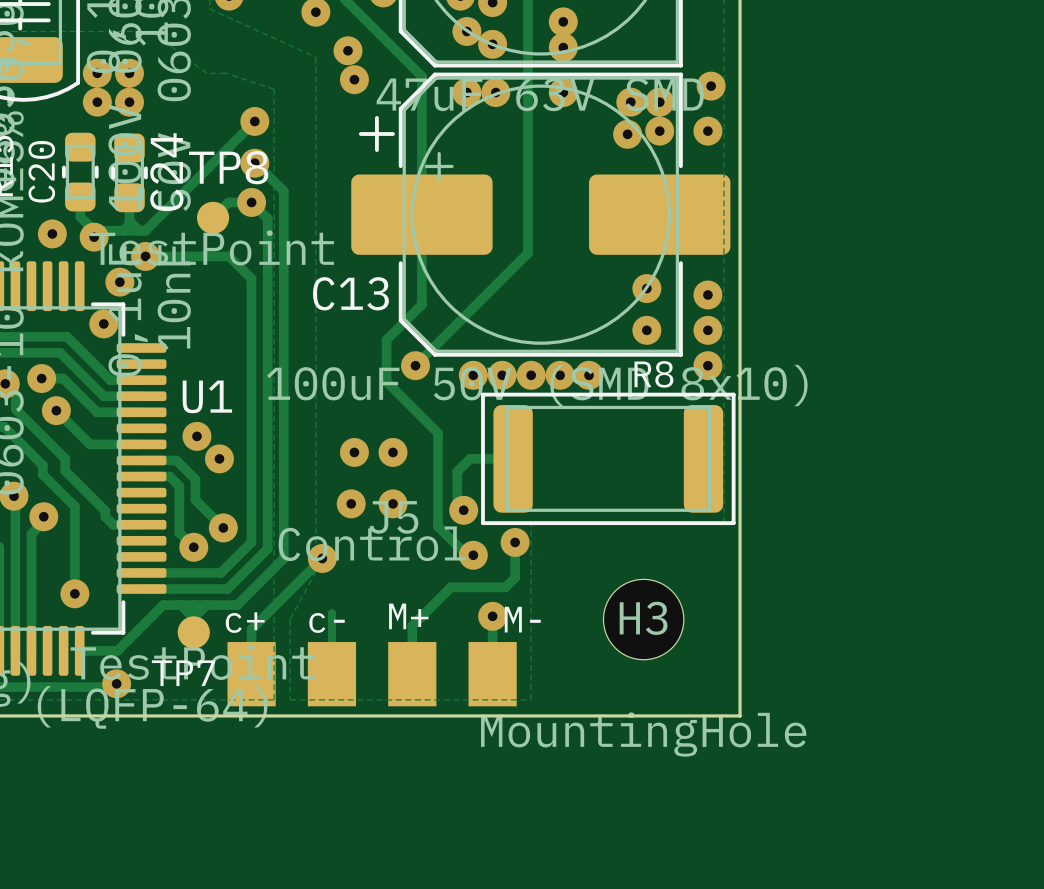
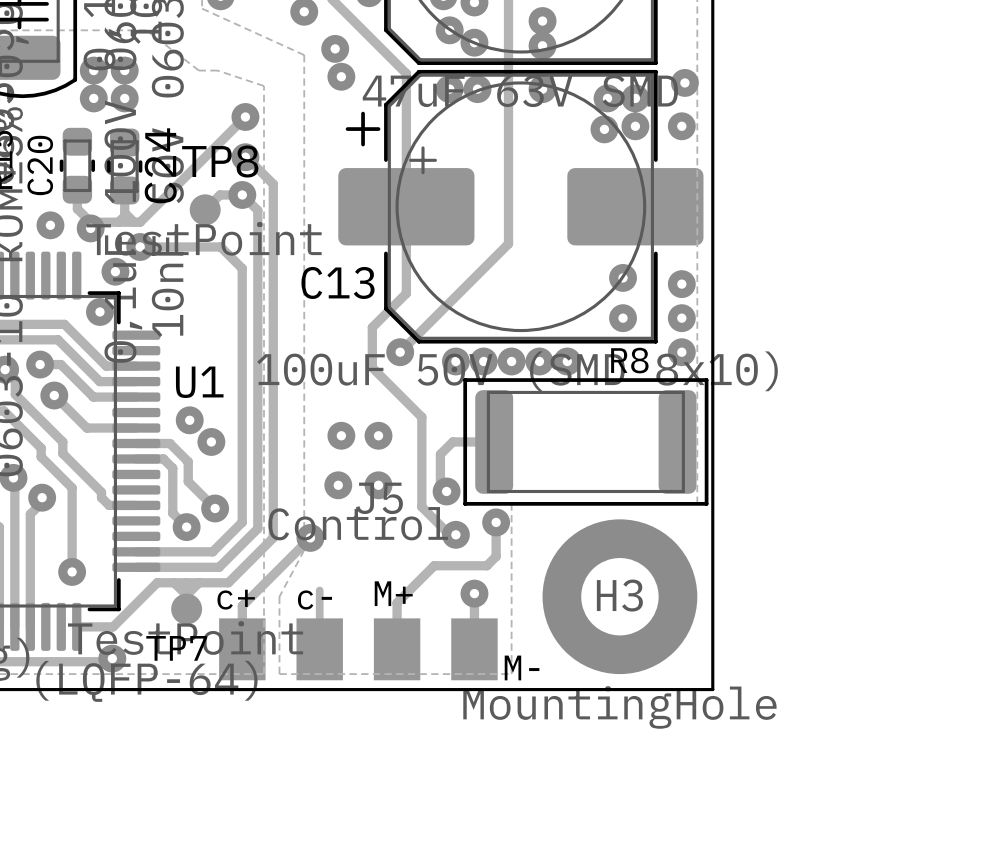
H3 footprint: [603, 579, 684, 660] -> [542, 519, 698, 675]
text position: M- (522, 619) -> M- (522, 667)

